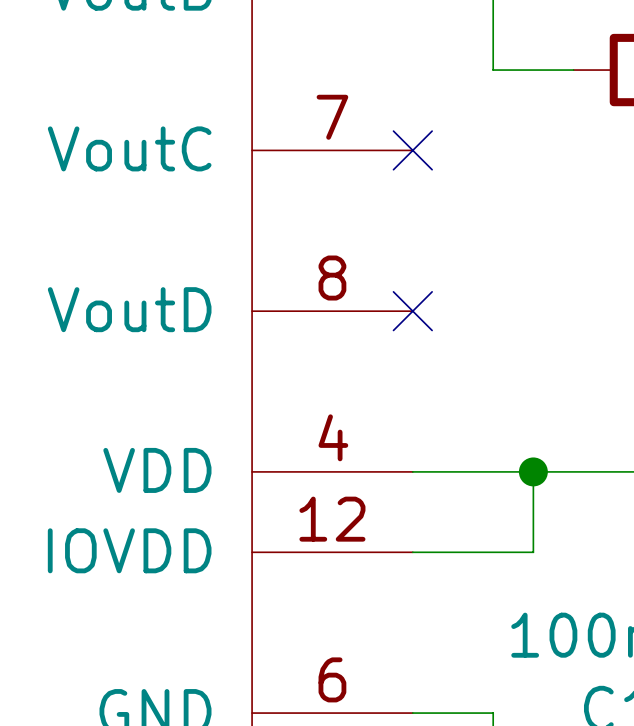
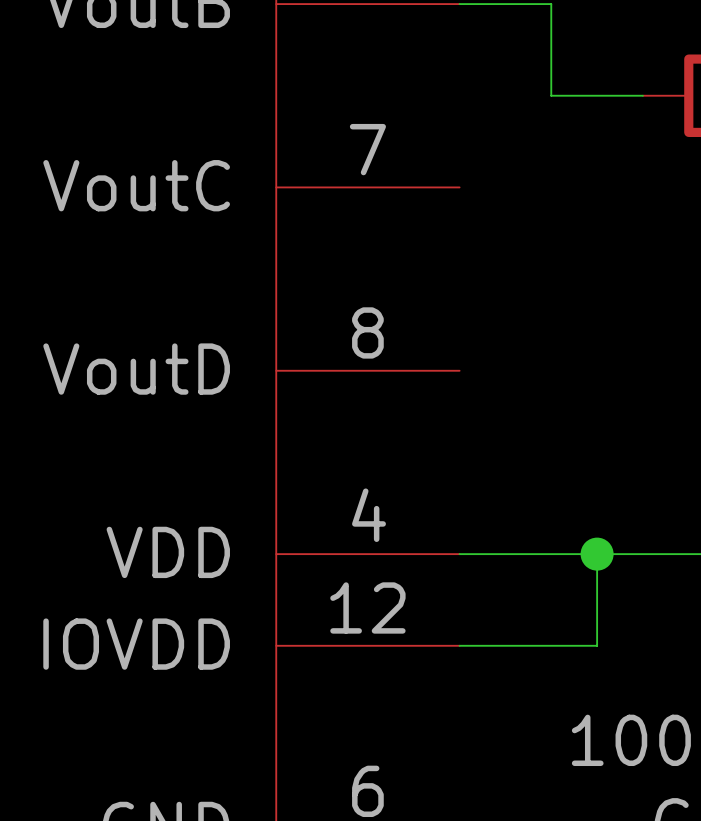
no-connect mark: (412, 150) -> none
no-connect mark: (412, 311) -> none

